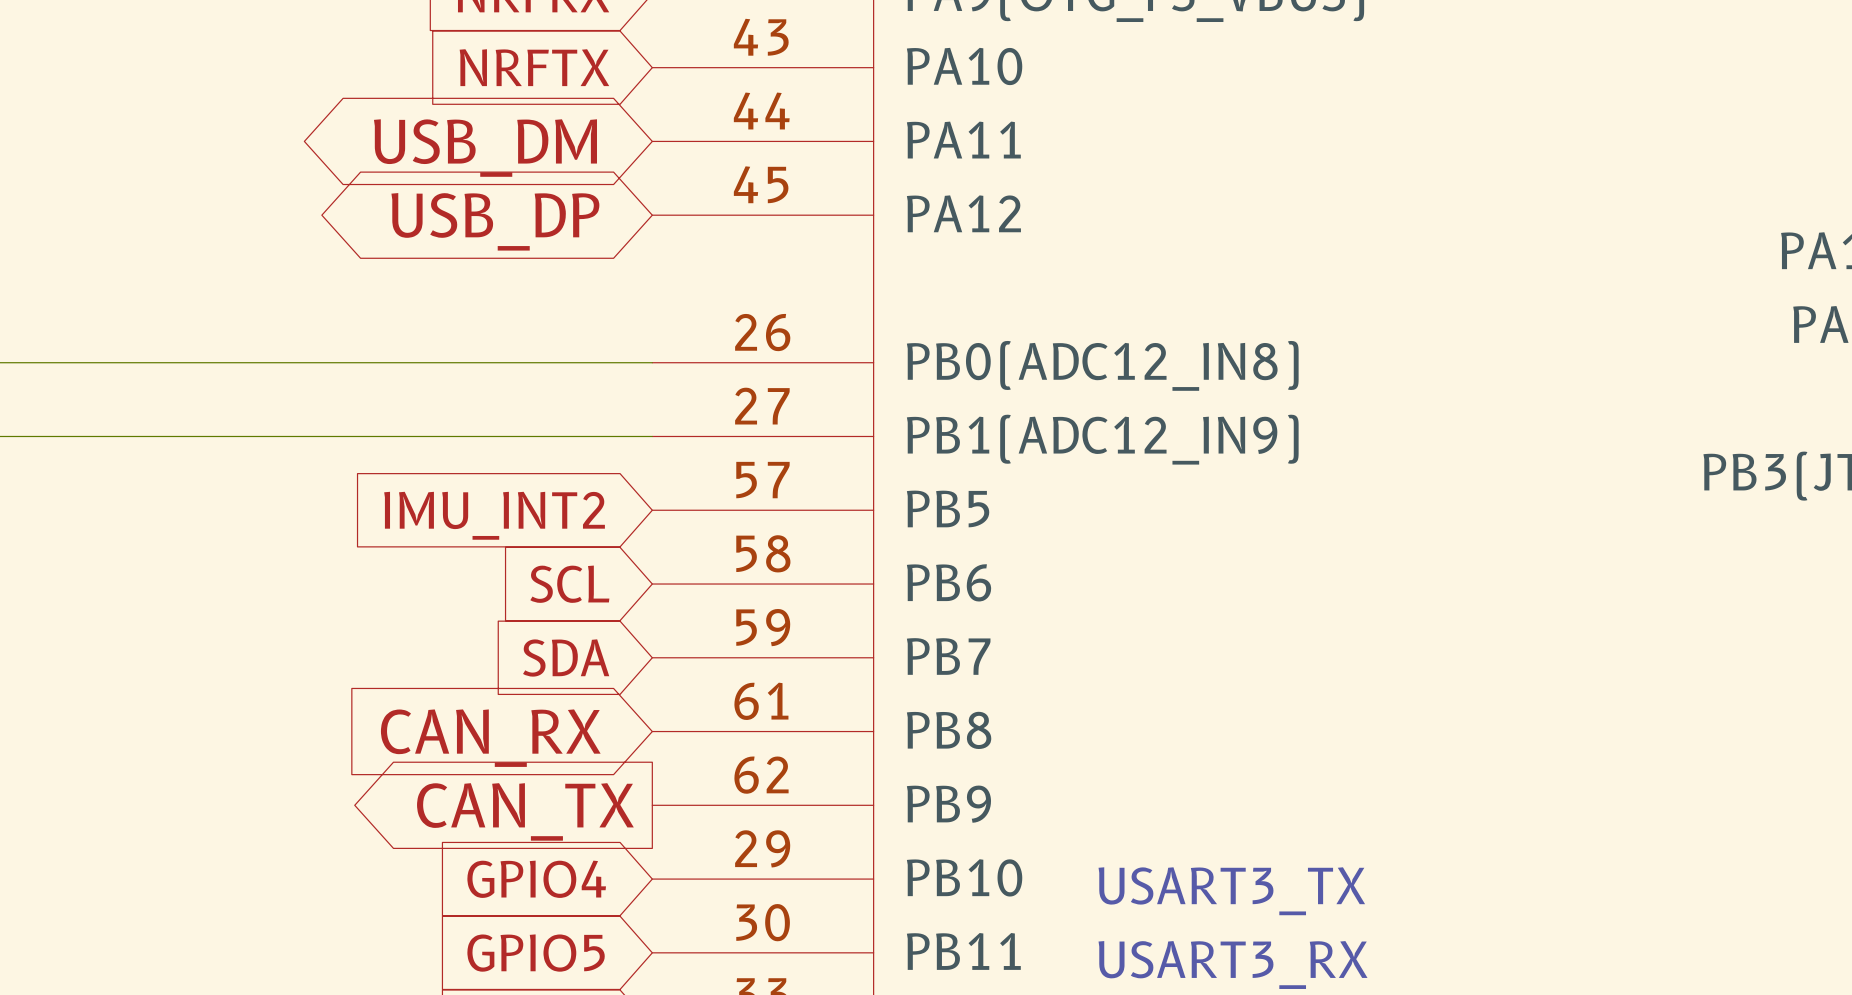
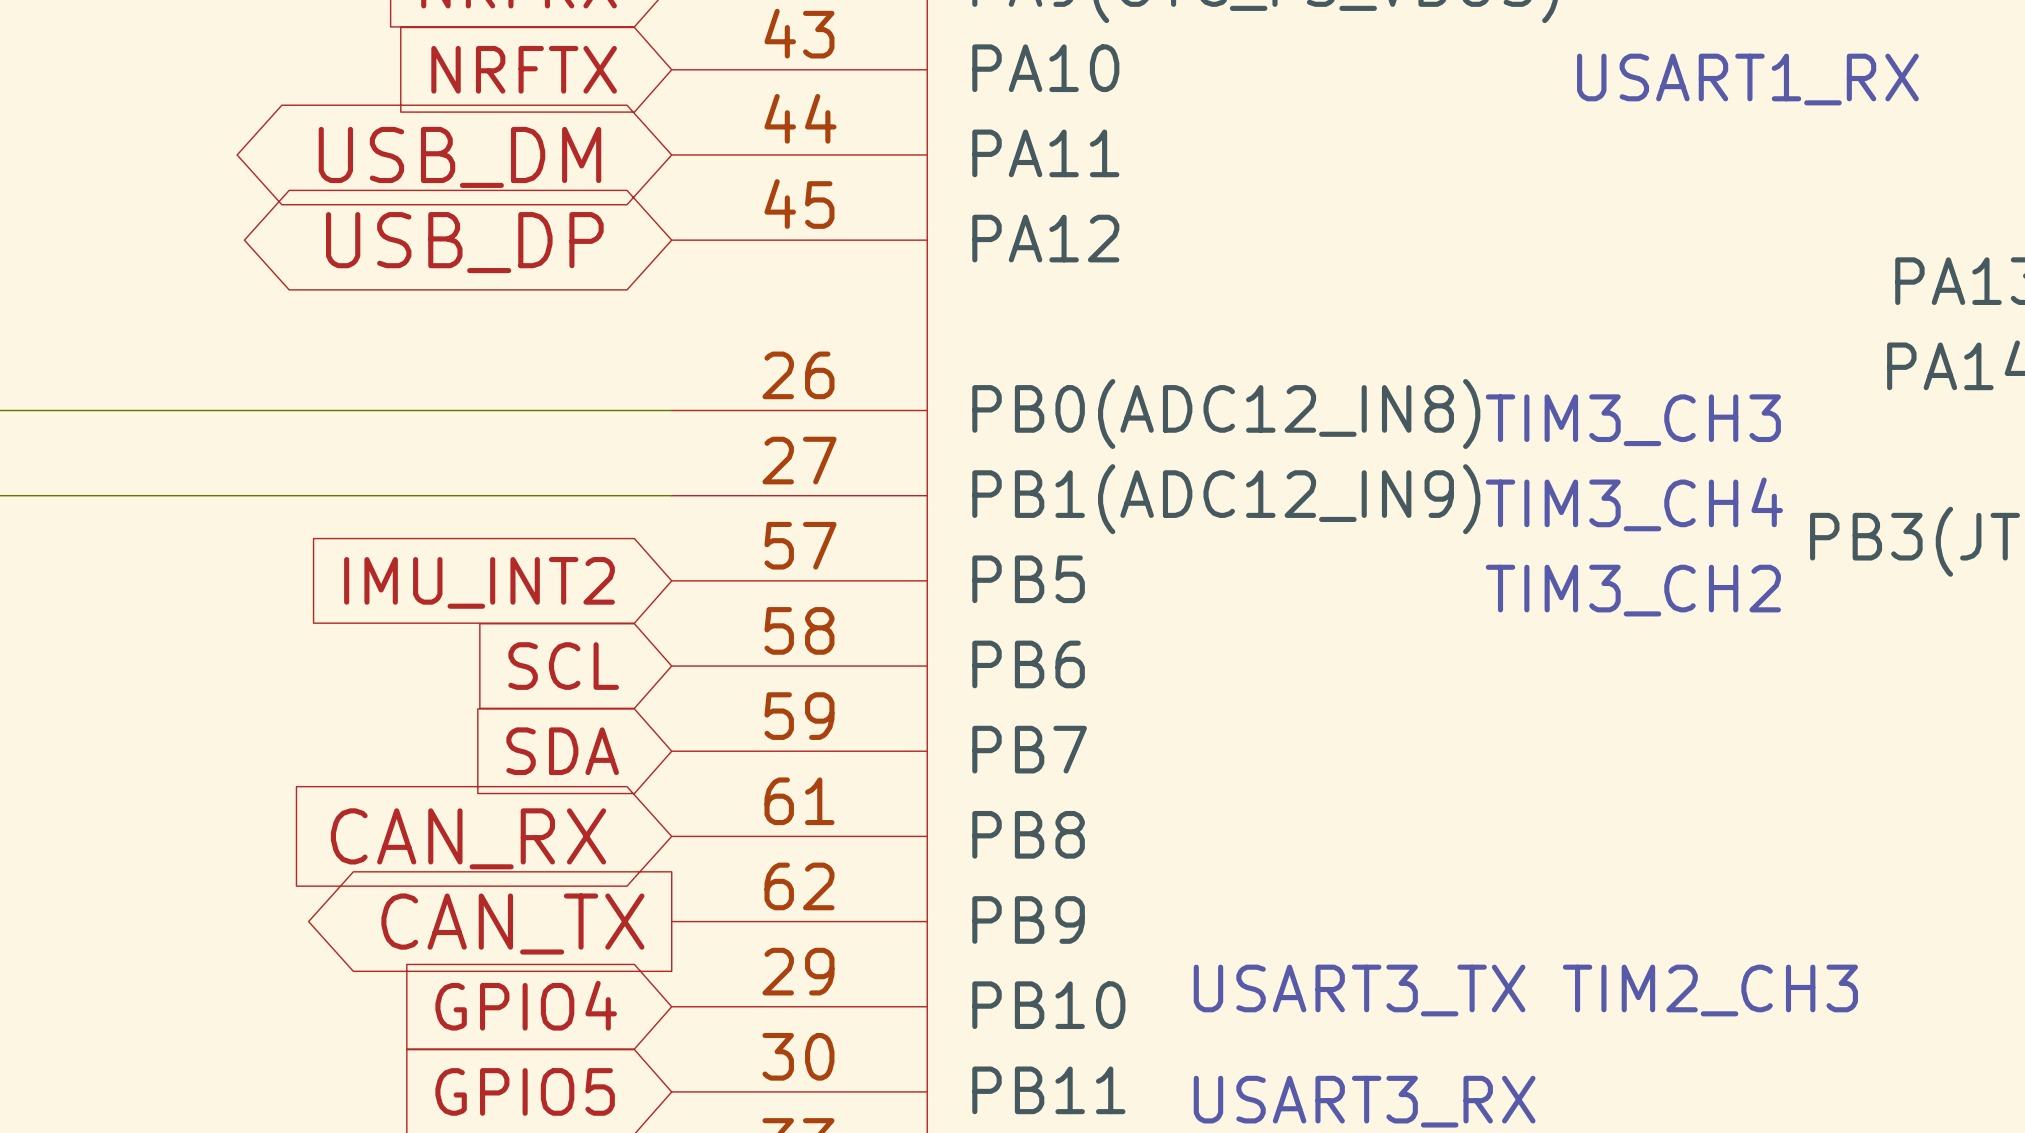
text: none -> USART1_RX (1747, 79)
text: none -> TIM3_CH3 (1633, 420)
text: none -> TIM3_CH4 (1634, 504)
text: none -> TIM3_CH2 (1633, 590)
text: USART3_TX (1231, 891) -> USART3_TX TIM2_CH3 (1525, 990)

